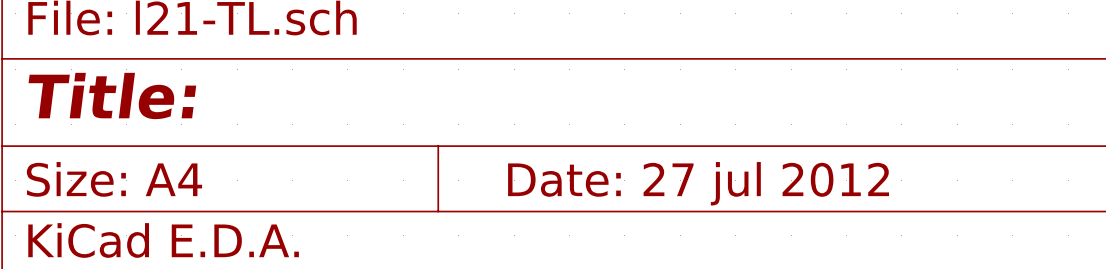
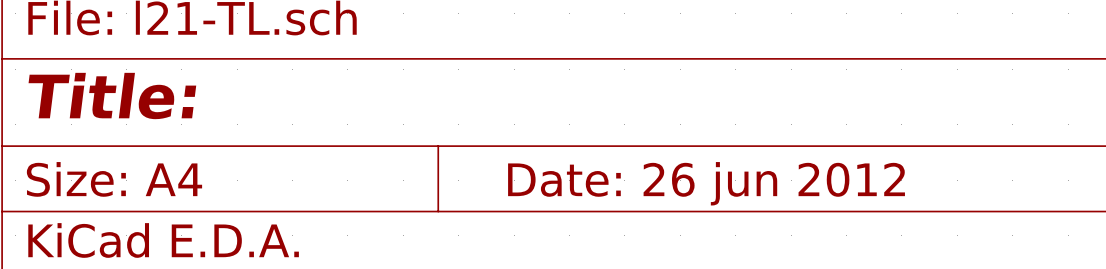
title block: Date: 27 jul 2012 (698, 183) -> Date: 26 jun 2012 (706, 183)

